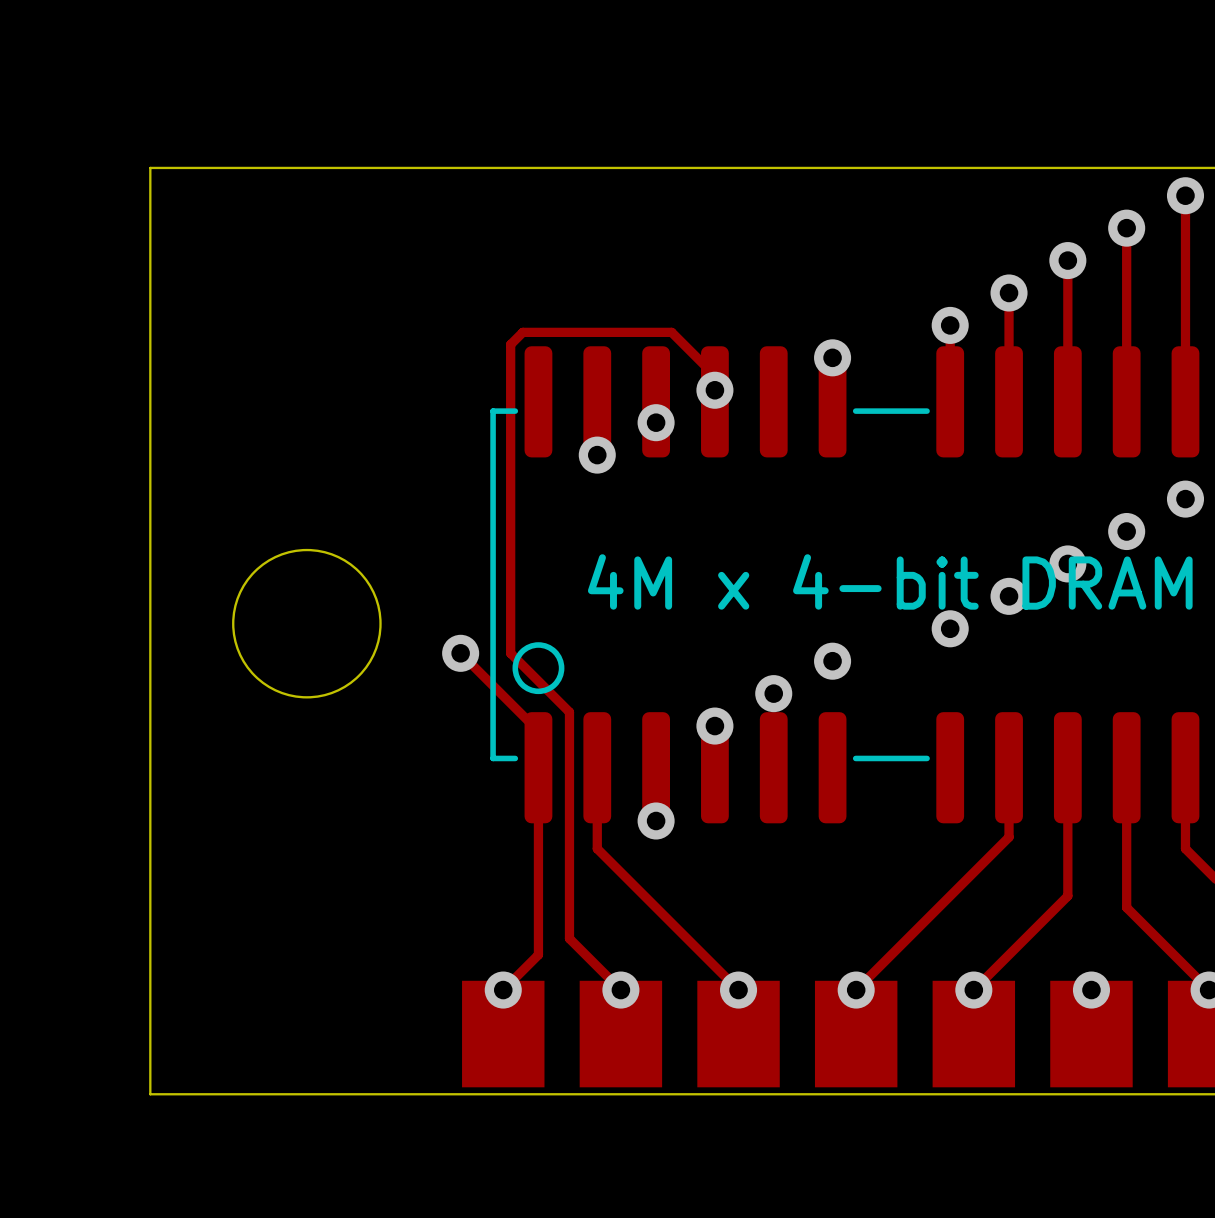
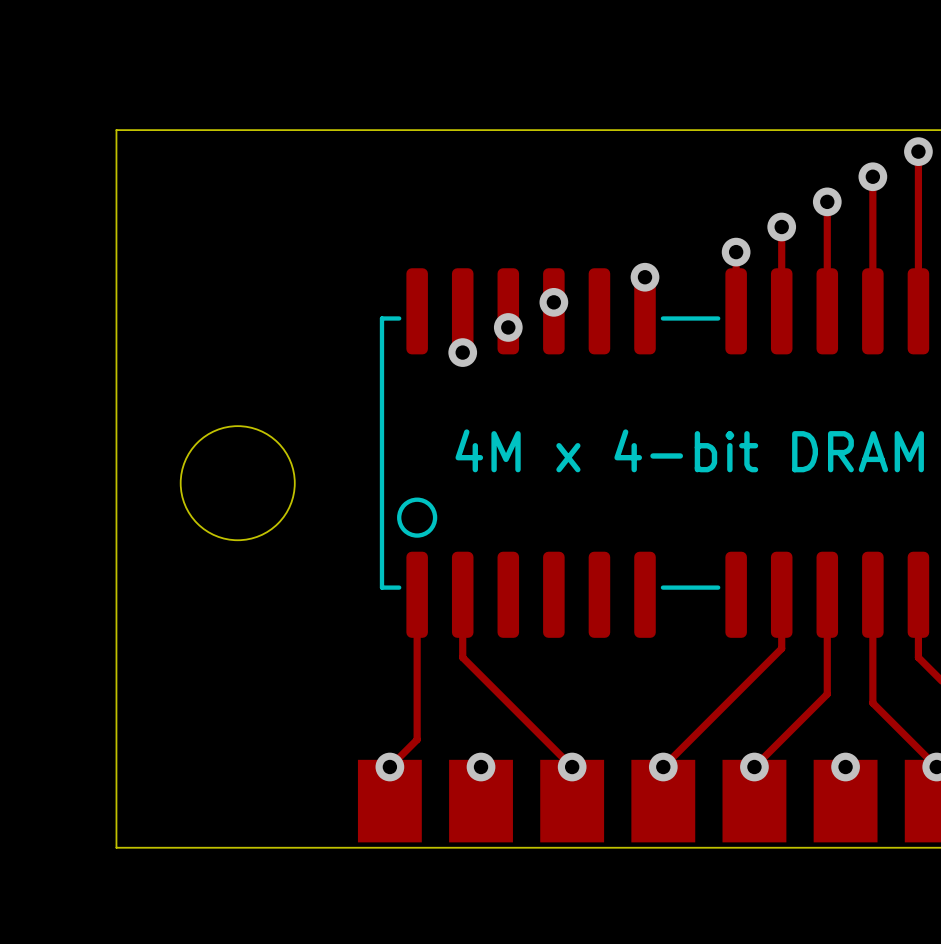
track: (714, 413) (714, 375) (671, 332) (522, 332) (510, 344) (510, 653) (569, 712) (569, 938) (620, 990) -> none
via: (1185, 499) -> none
via: (1126, 531) -> none
via: (1067, 563) -> none
via: (1009, 596) -> none
via: (950, 628) -> none
track: (460, 653) (538, 731) -> none
via: (460, 653) -> none
via: (832, 661) -> none
via: (773, 693) -> none
via: (714, 726) -> none
via: (656, 820) -> none

